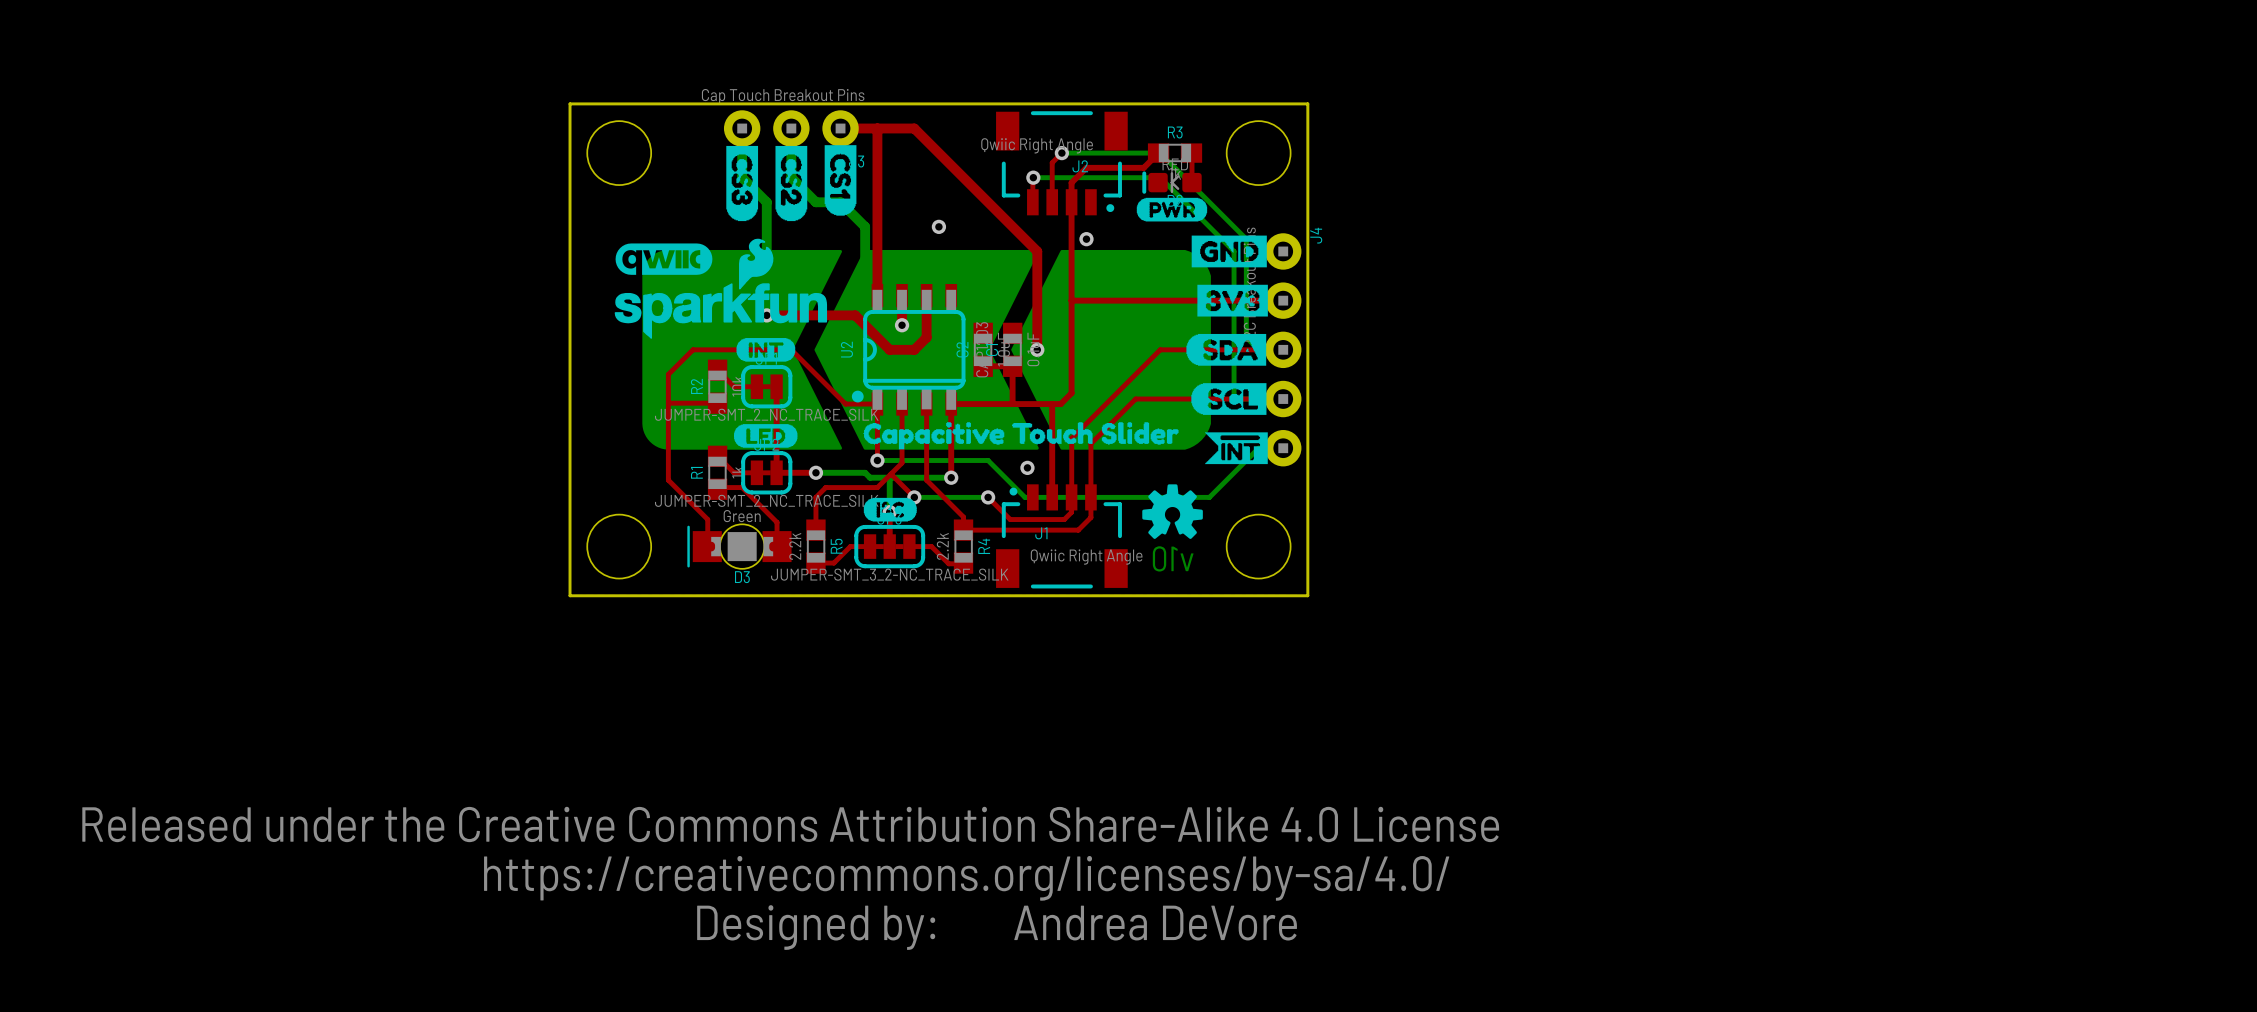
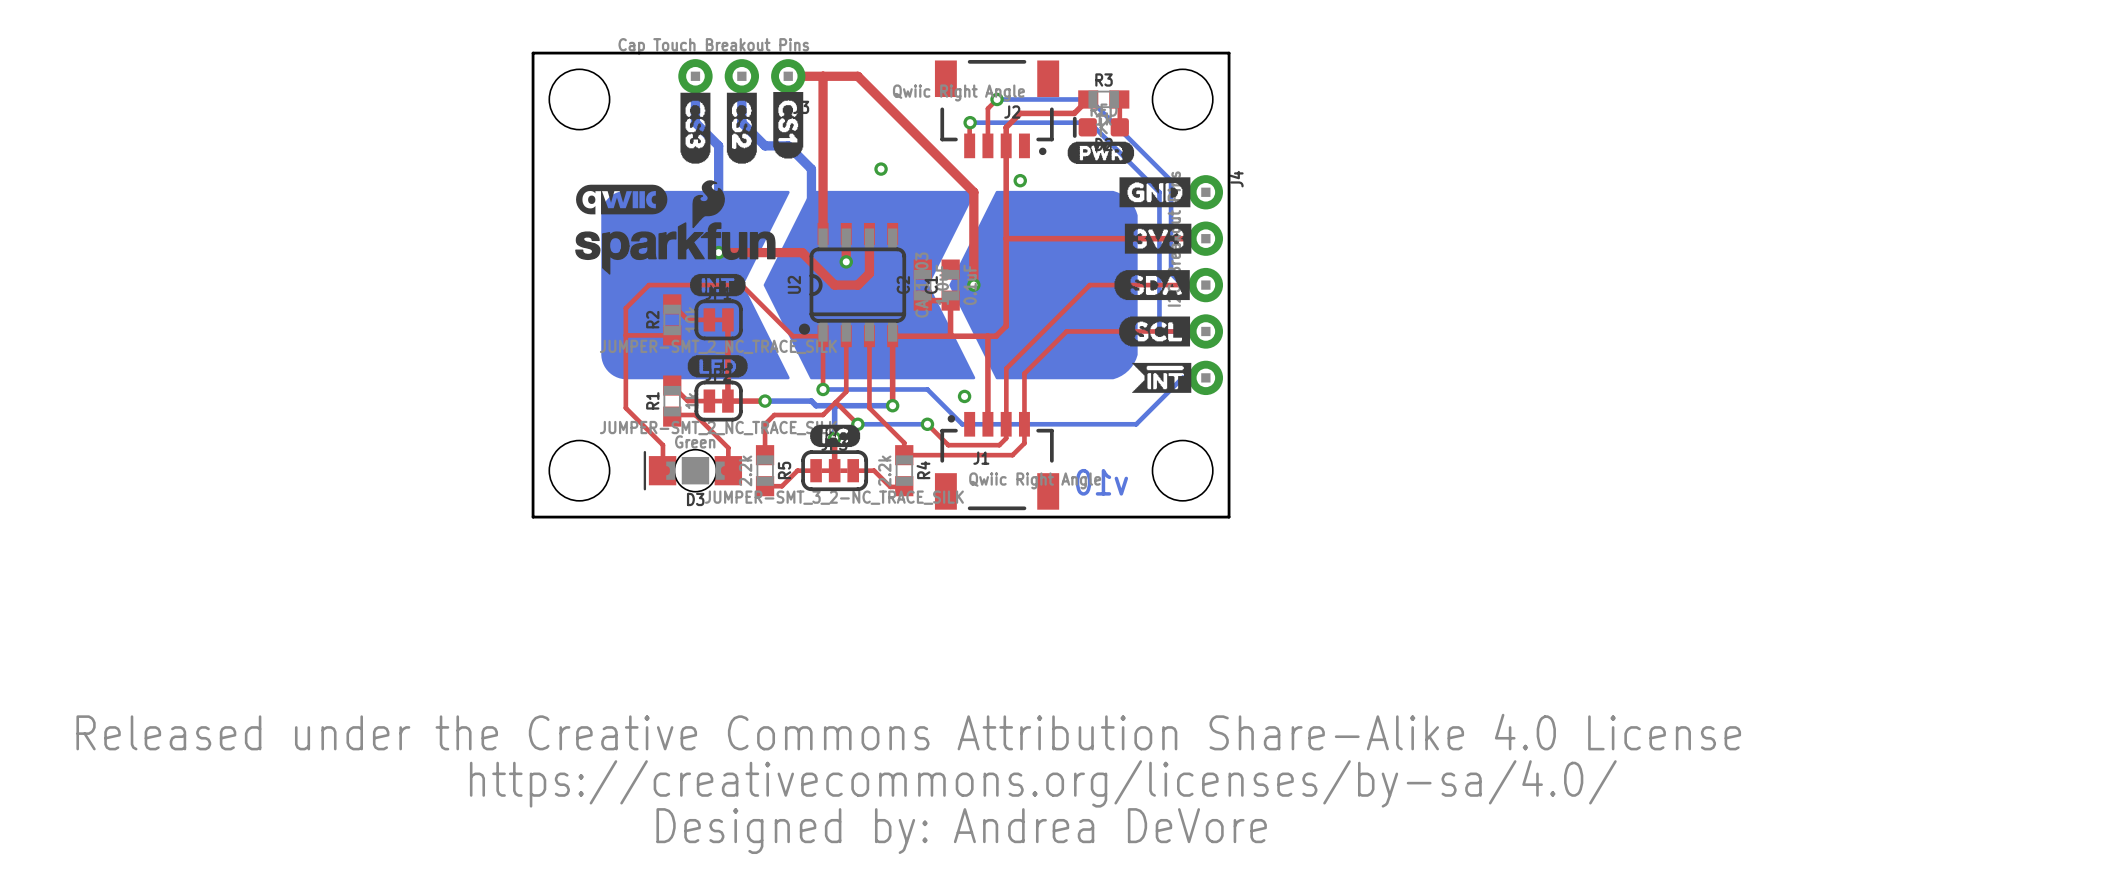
drawing: [863, 422, 1179, 450] -> none
drawing: [1142, 484, 1203, 539] -> none

